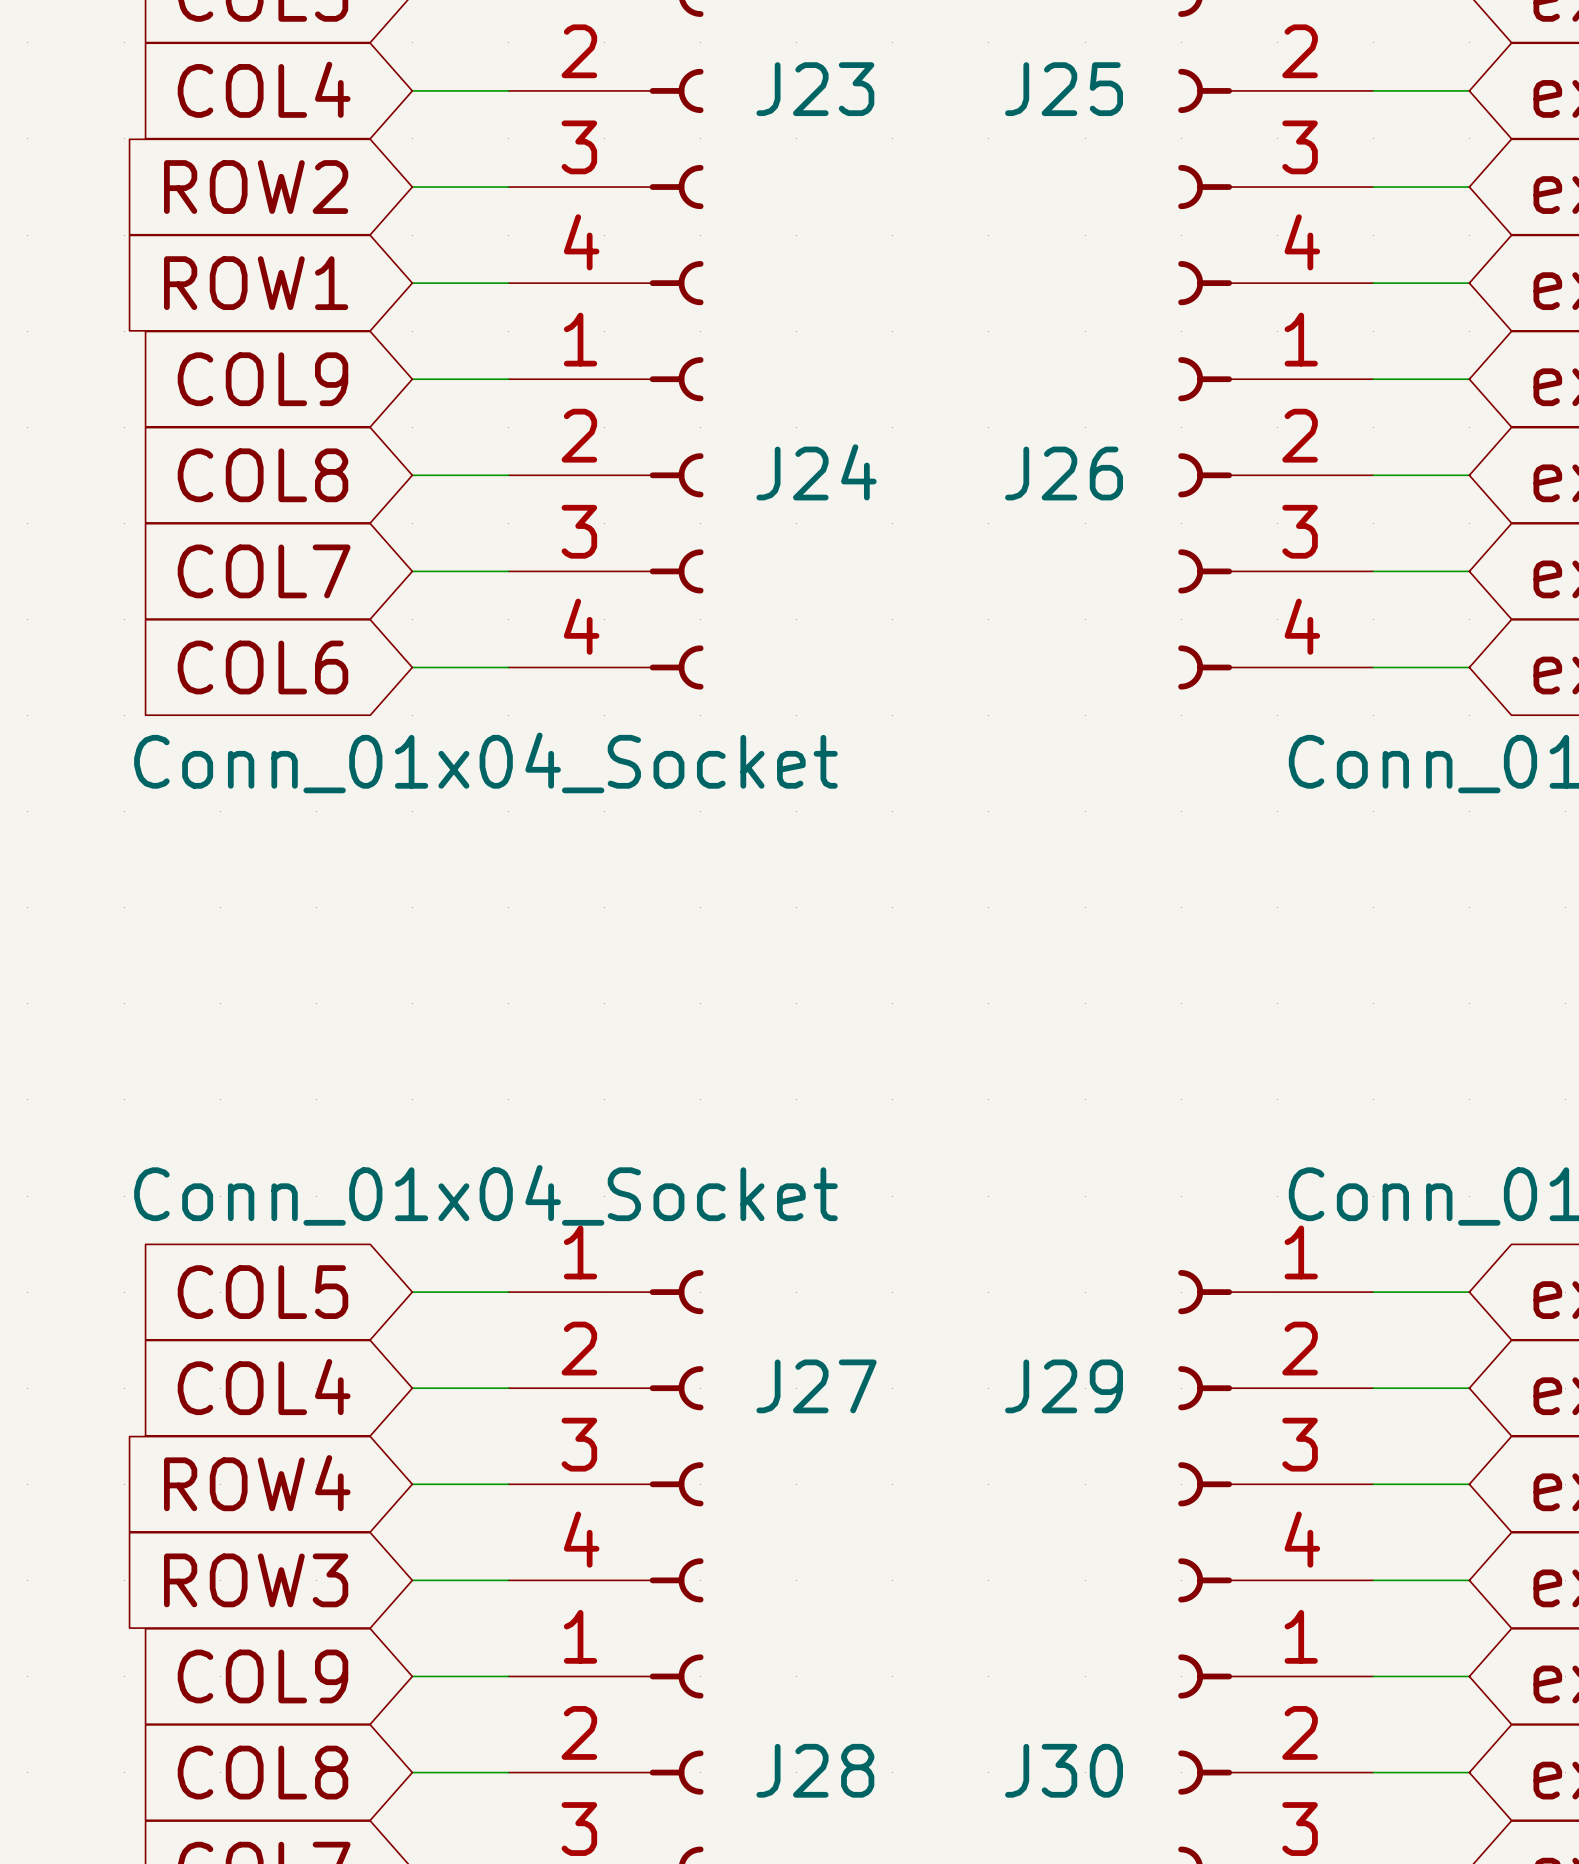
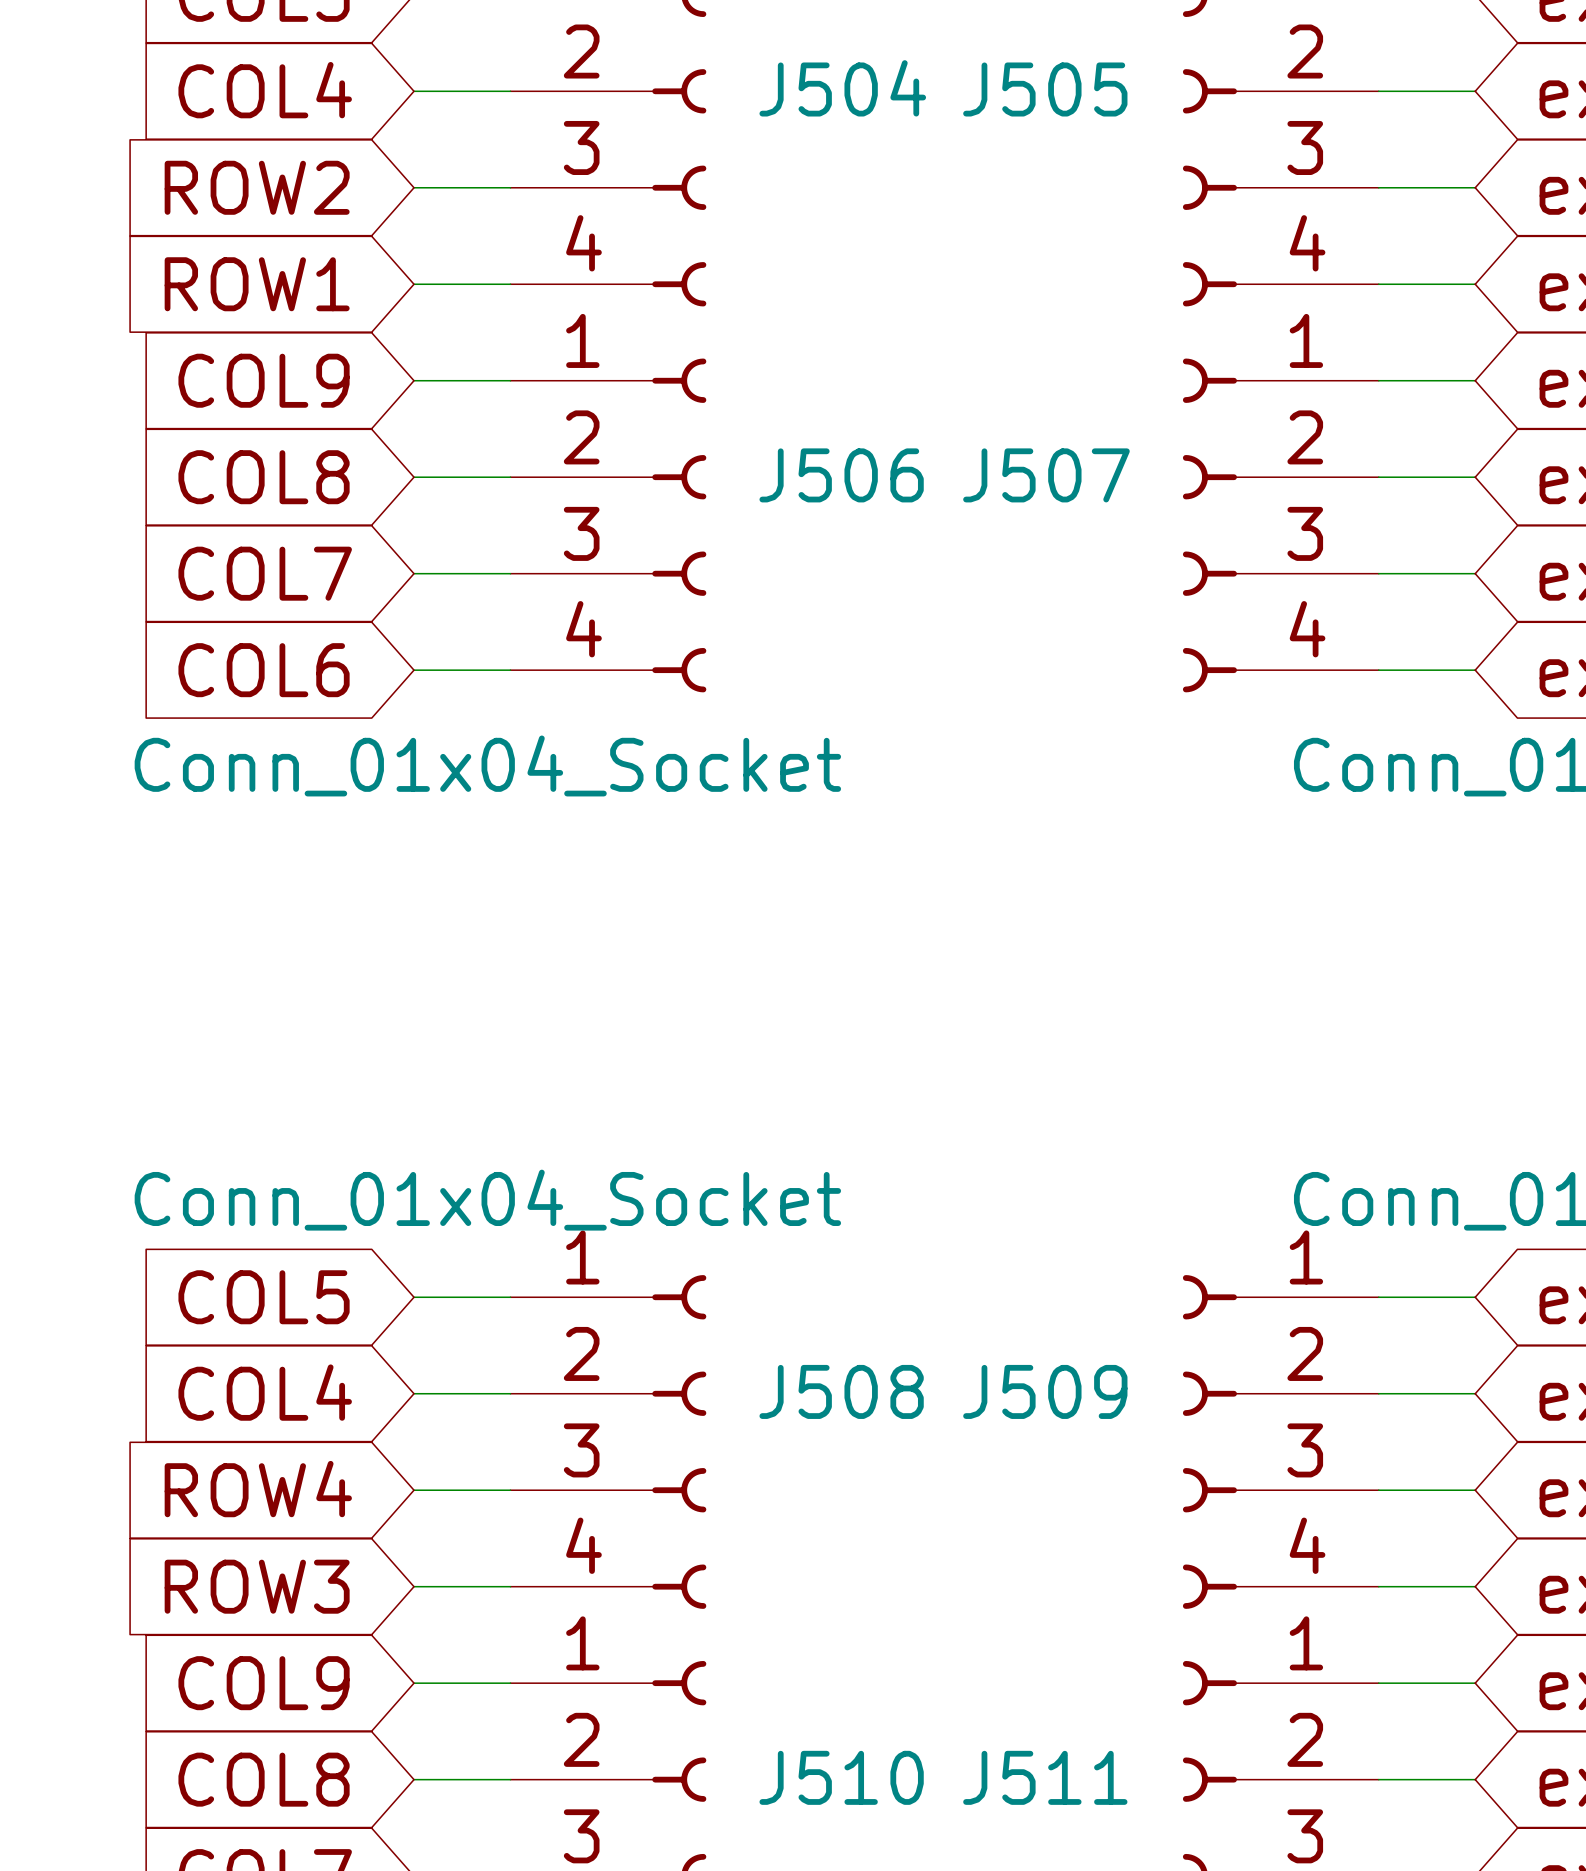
J23 name: J23 (815, 89) -> J504 (842, 88)
J25 name: J25 (1064, 89) -> J505 (1045, 89)
J24 name: J24 (816, 472) -> J506 (841, 475)
J26 name: J26 (1064, 473) -> J507 (1046, 475)
J27 name: J27 (816, 1386) -> J508 (841, 1391)
J29 name: J29 (1064, 1386) -> J509 (1045, 1391)
J28 name: J28 (815, 1770) -> J510 (841, 1777)
J30 name: J30 (1064, 1770) -> J511 (1045, 1777)

